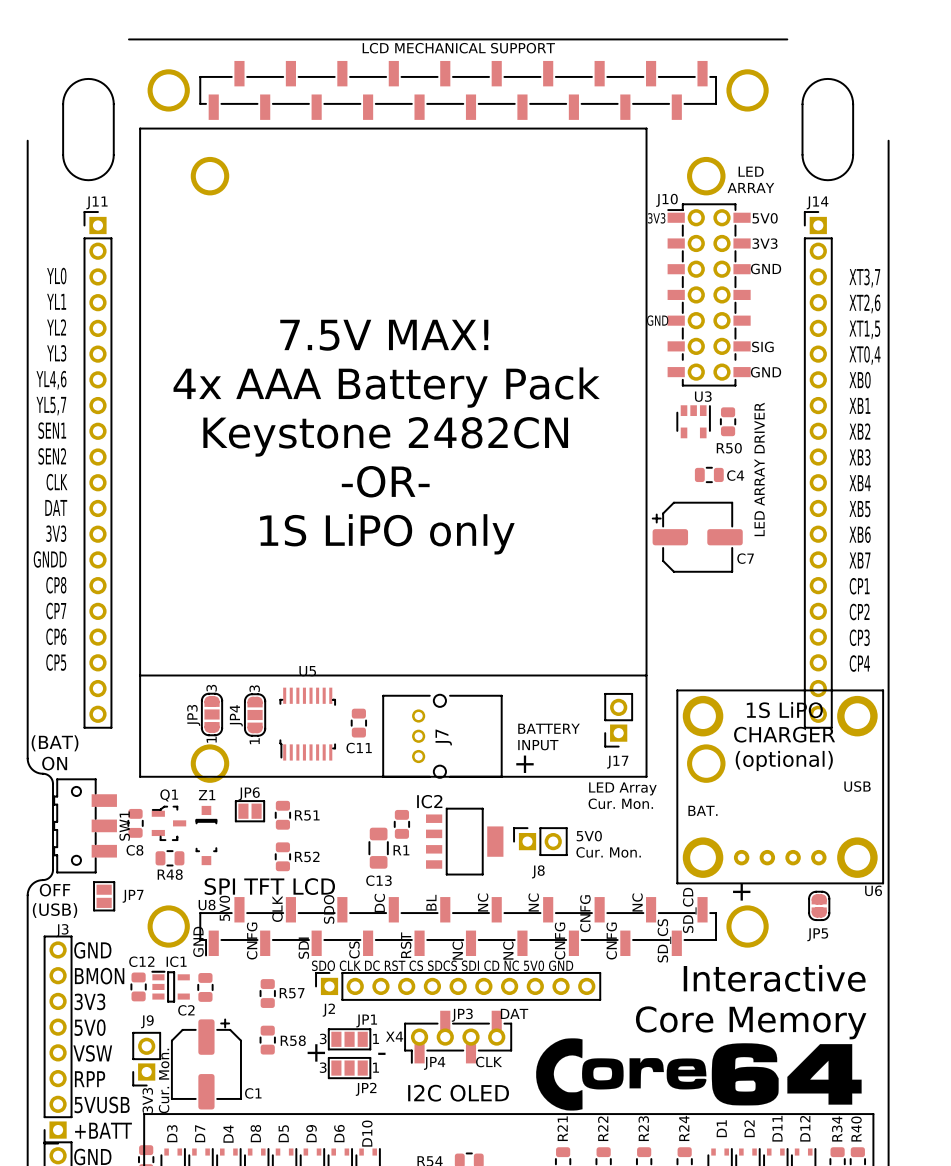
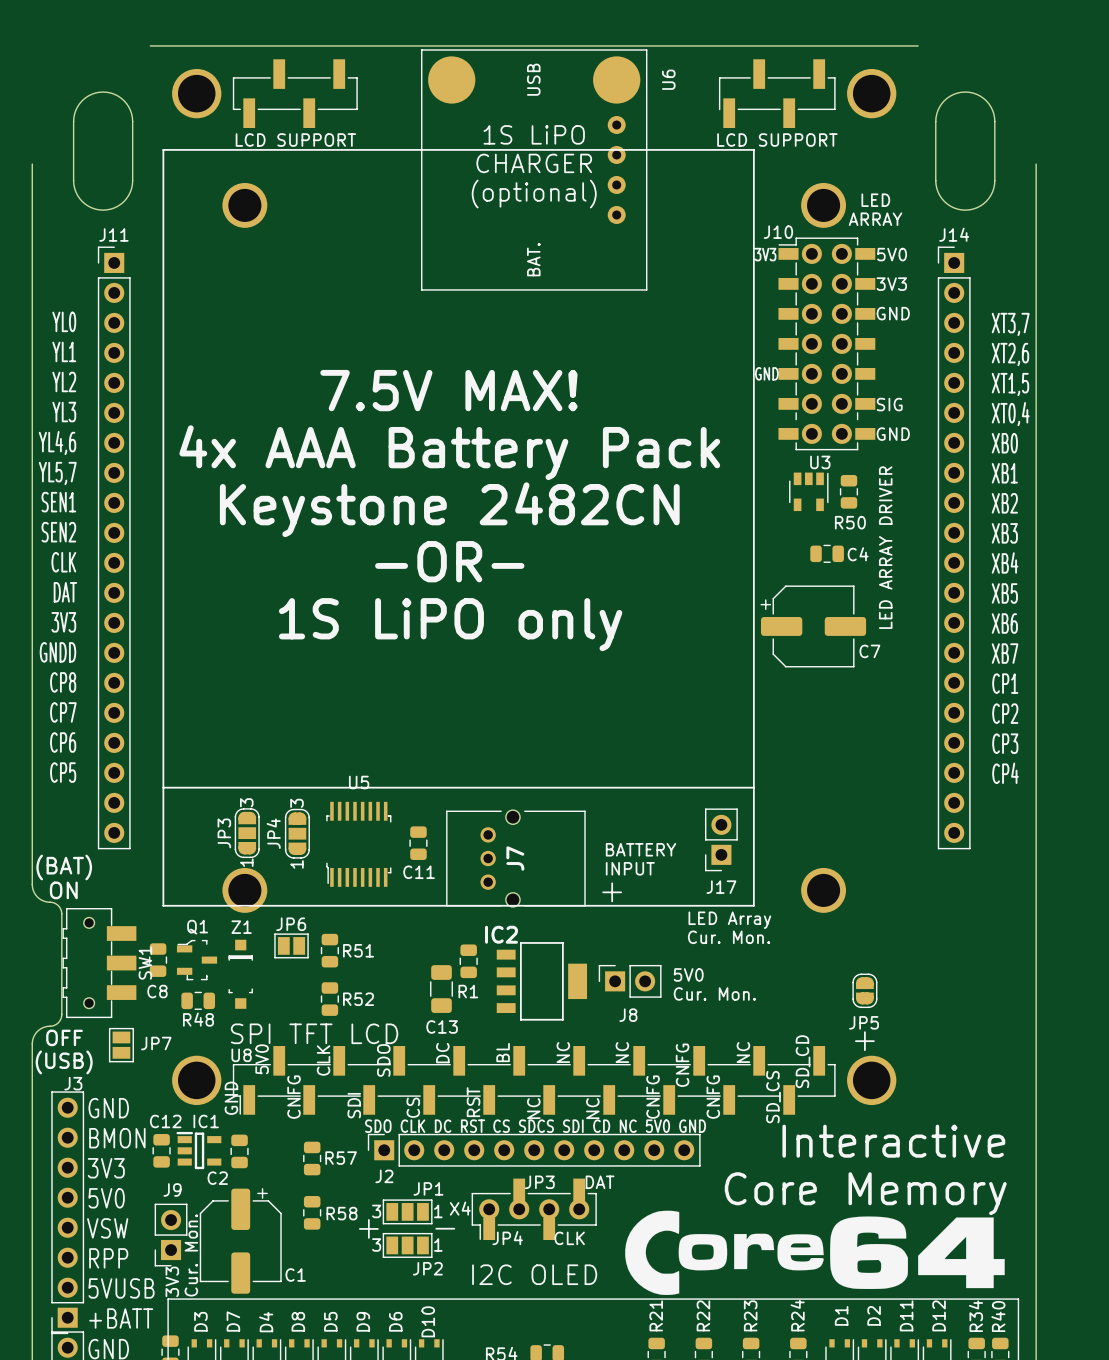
text: LCD MECHANICAL SUPPORT (458, 48) -> none
U8 footprint: [147, 60, 769, 957] -> [172, 59, 897, 1115]
text: none -> 1S LiPO (534, 134)
text: none -> LCD SUPPORT (295, 140)
text: none -> LCD SUPPORT (777, 140)
text: none -> CHARGER (534, 163)
text: none -> (optional) (534, 194)
U6 footprint: [676, 689, 884, 884] -> [421, 49, 648, 291]
text: 1S LiPO (784, 710) -> none
text: CHARGER (784, 734) -> none
text: (optional) (784, 760) -> none
U6 name position: U6 (873, 890) -> U6 (668, 79)
JP5 position: (819, 905) -> (864, 990)

